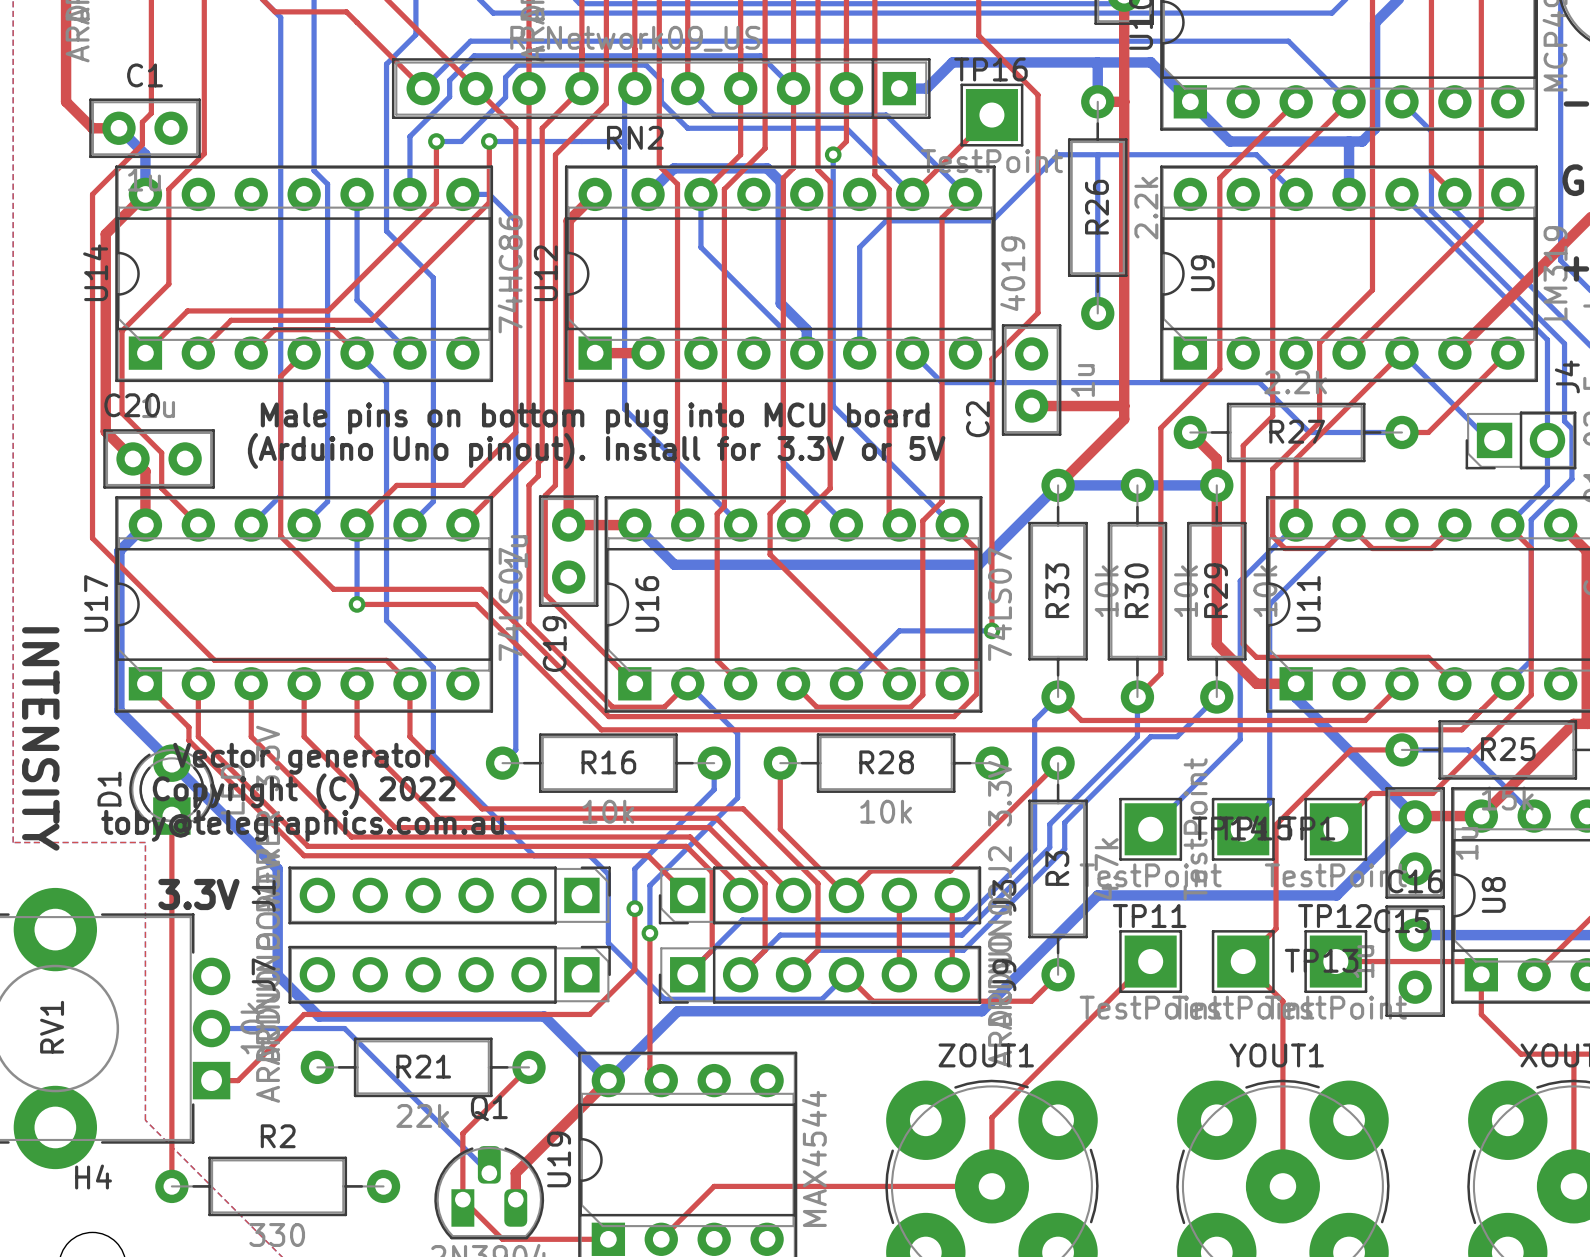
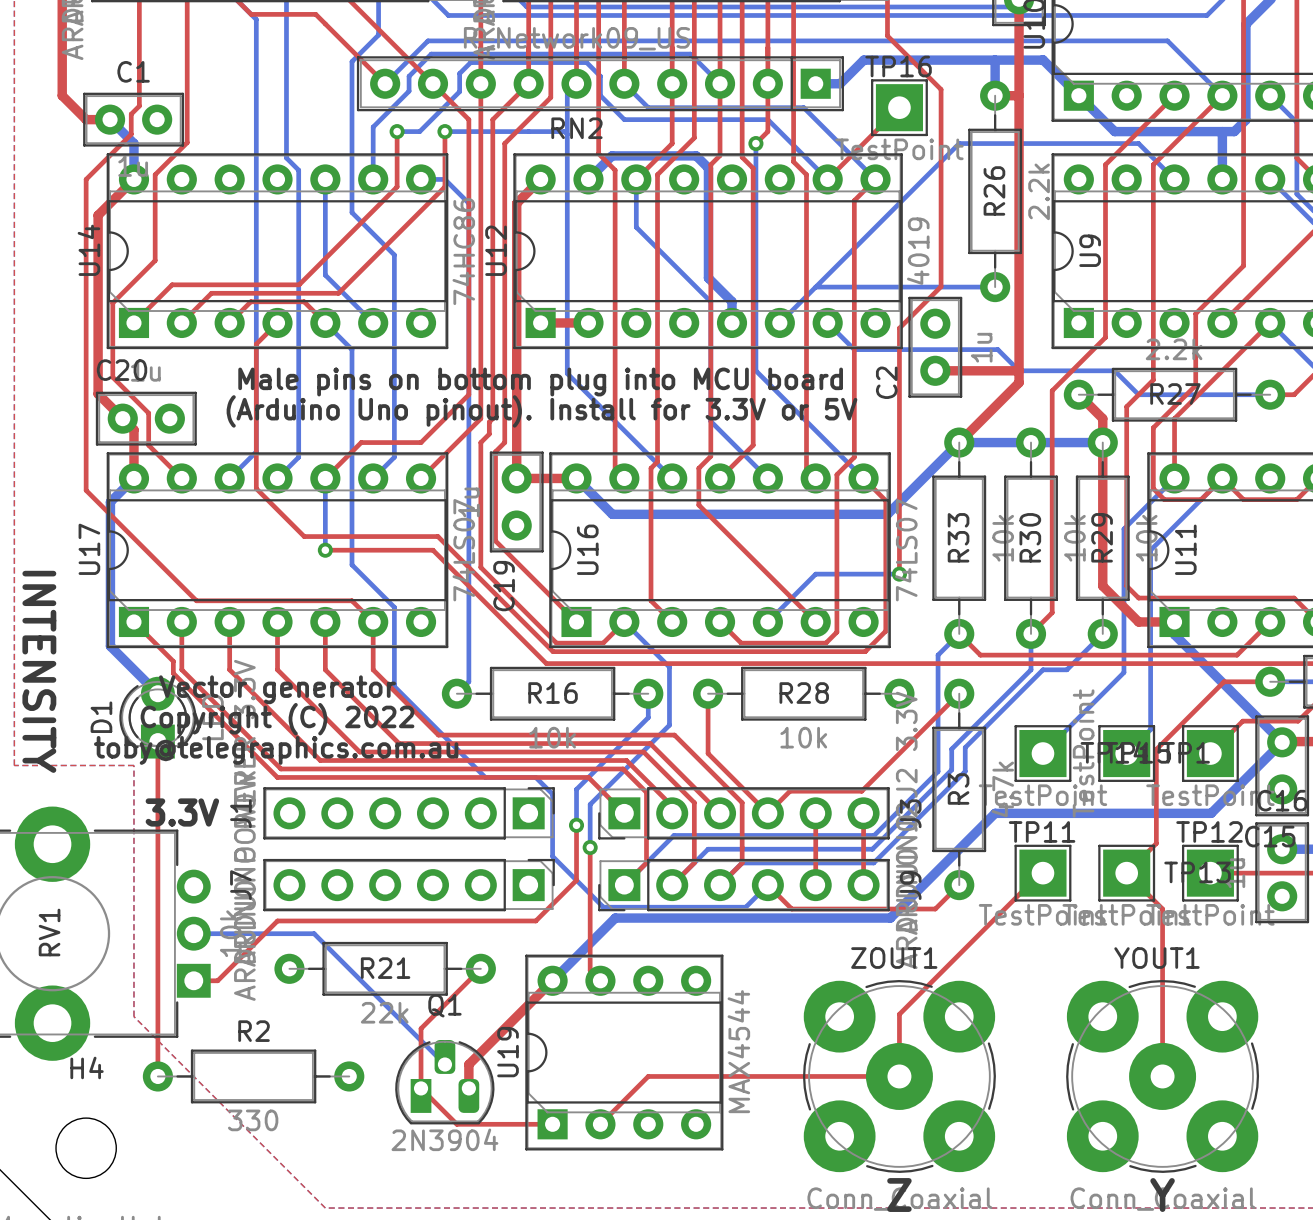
bottom track: (1097, 154) (1097, 313) -> (815, 287) (995, 287)
bottom track: (991, 220) (886, 220) (859, 247) (859, 353) -> (899, 203) (779, 322)
bottom track: (1100, 382) (1259, 382) (1309, 432) -> (997, 349) (1019, 370) (1114, 370) (1138, 394) (1186, 394)
bottom track: (171, 763) (277, 868) (277, 975) (319, 1016) (544, 1016) (608, 1080) -> none

